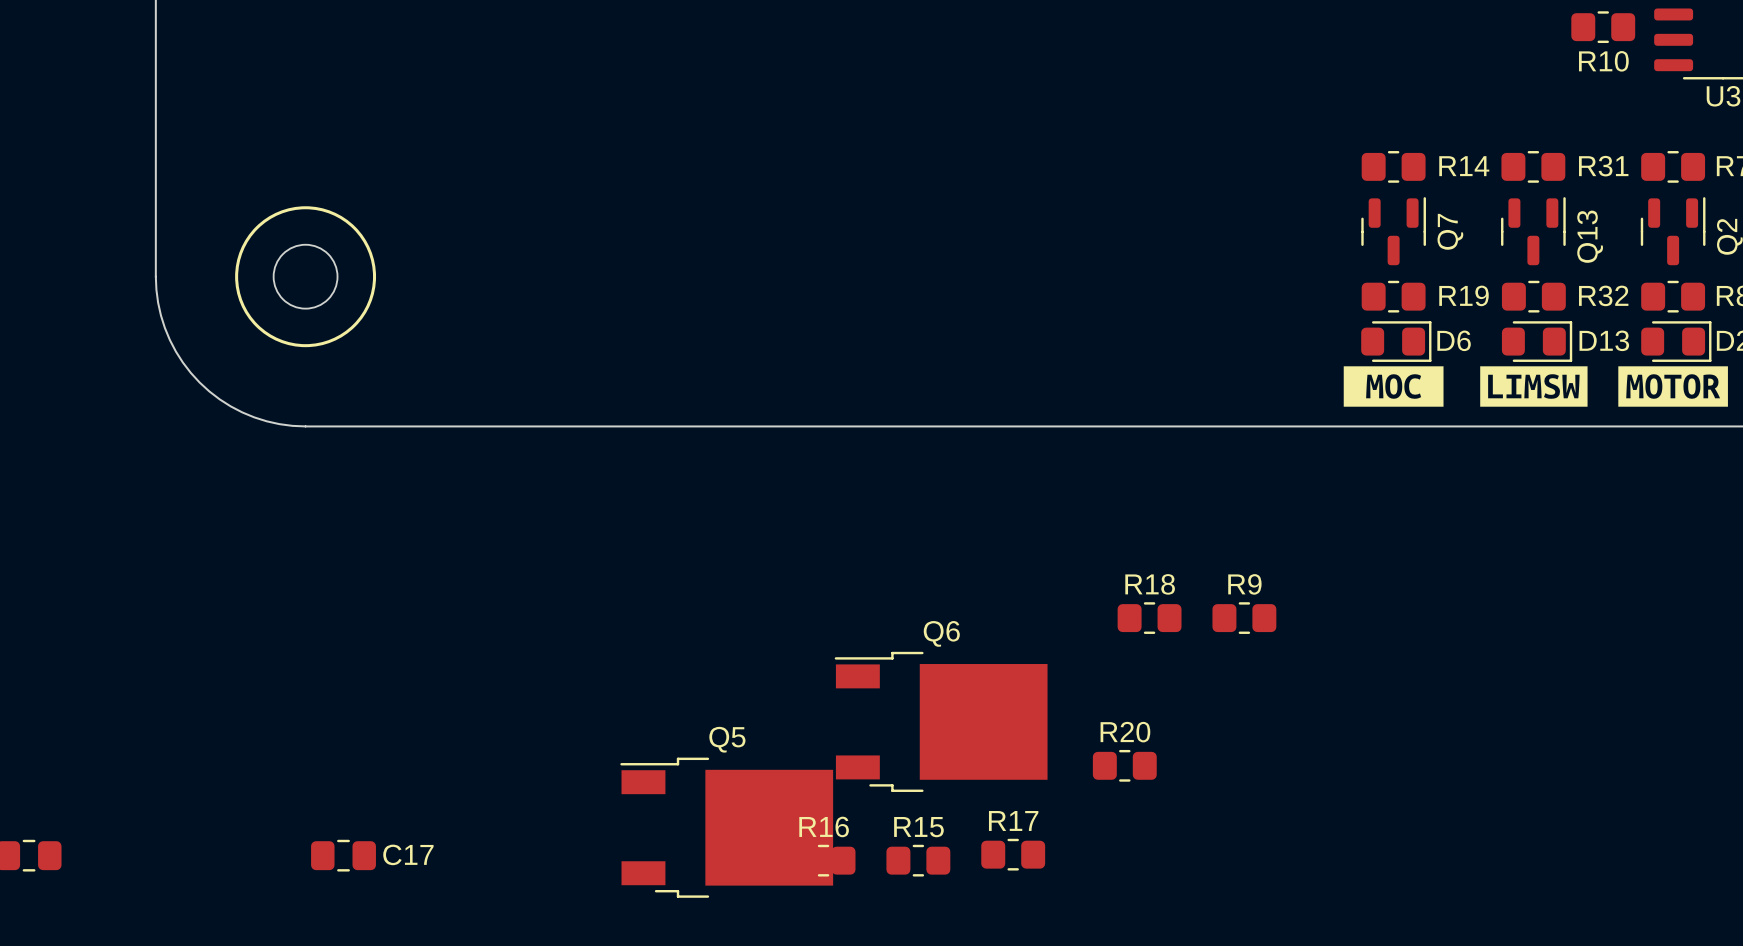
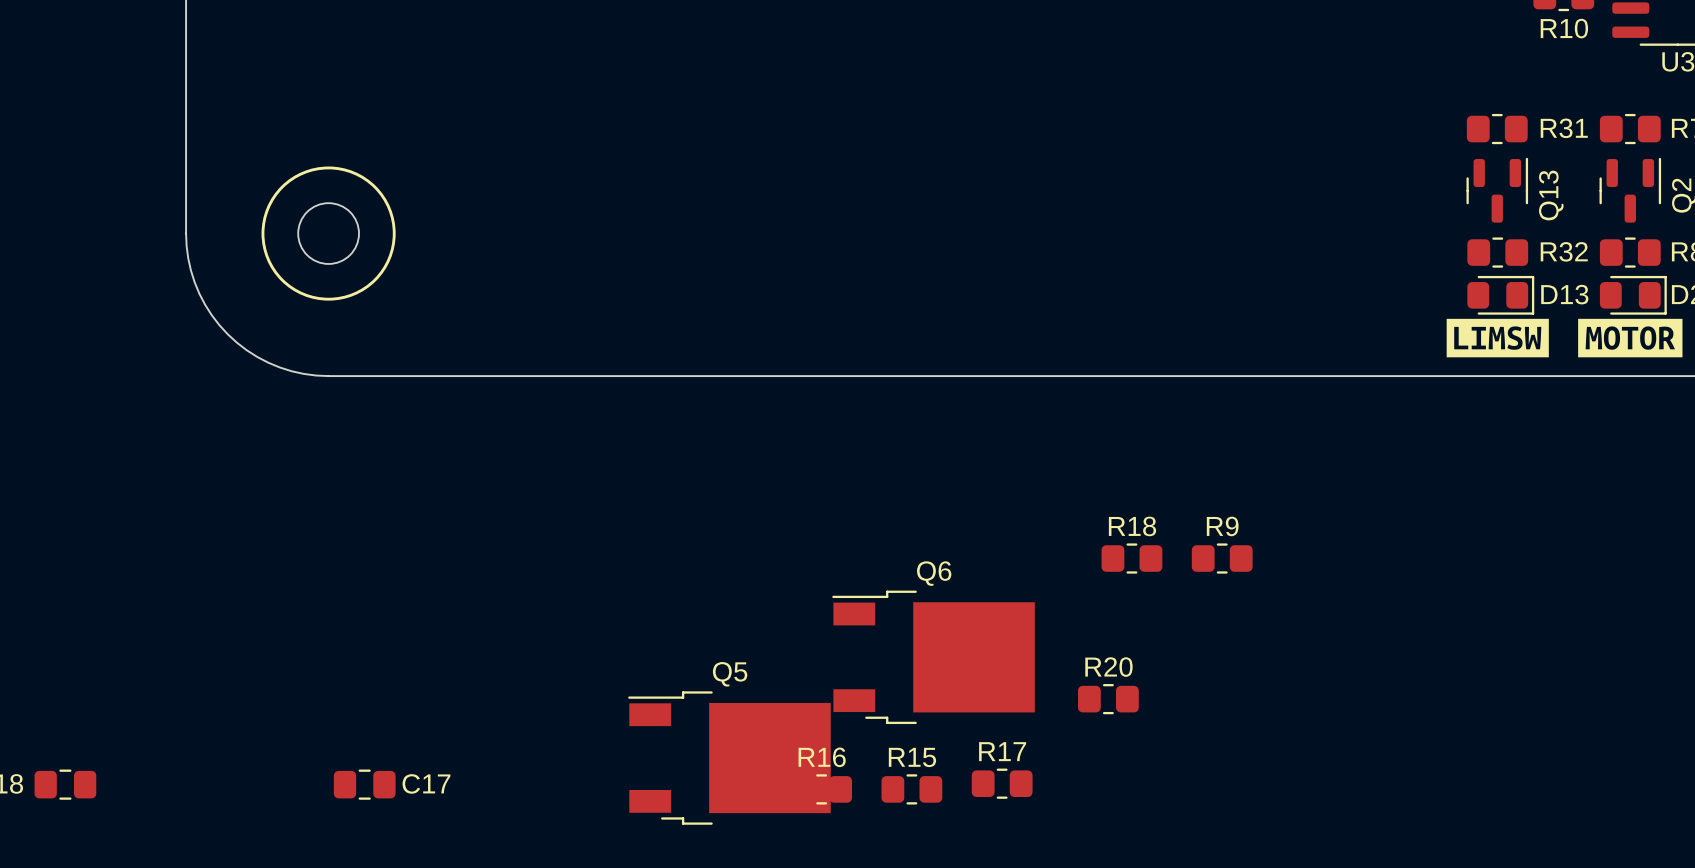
R14: (1393, 166) -> none
Q7: (1393, 231) -> none
R19: (1393, 296) -> none
D6: (1396, 341) -> none
drawing: [1343, 366, 1444, 407] -> none

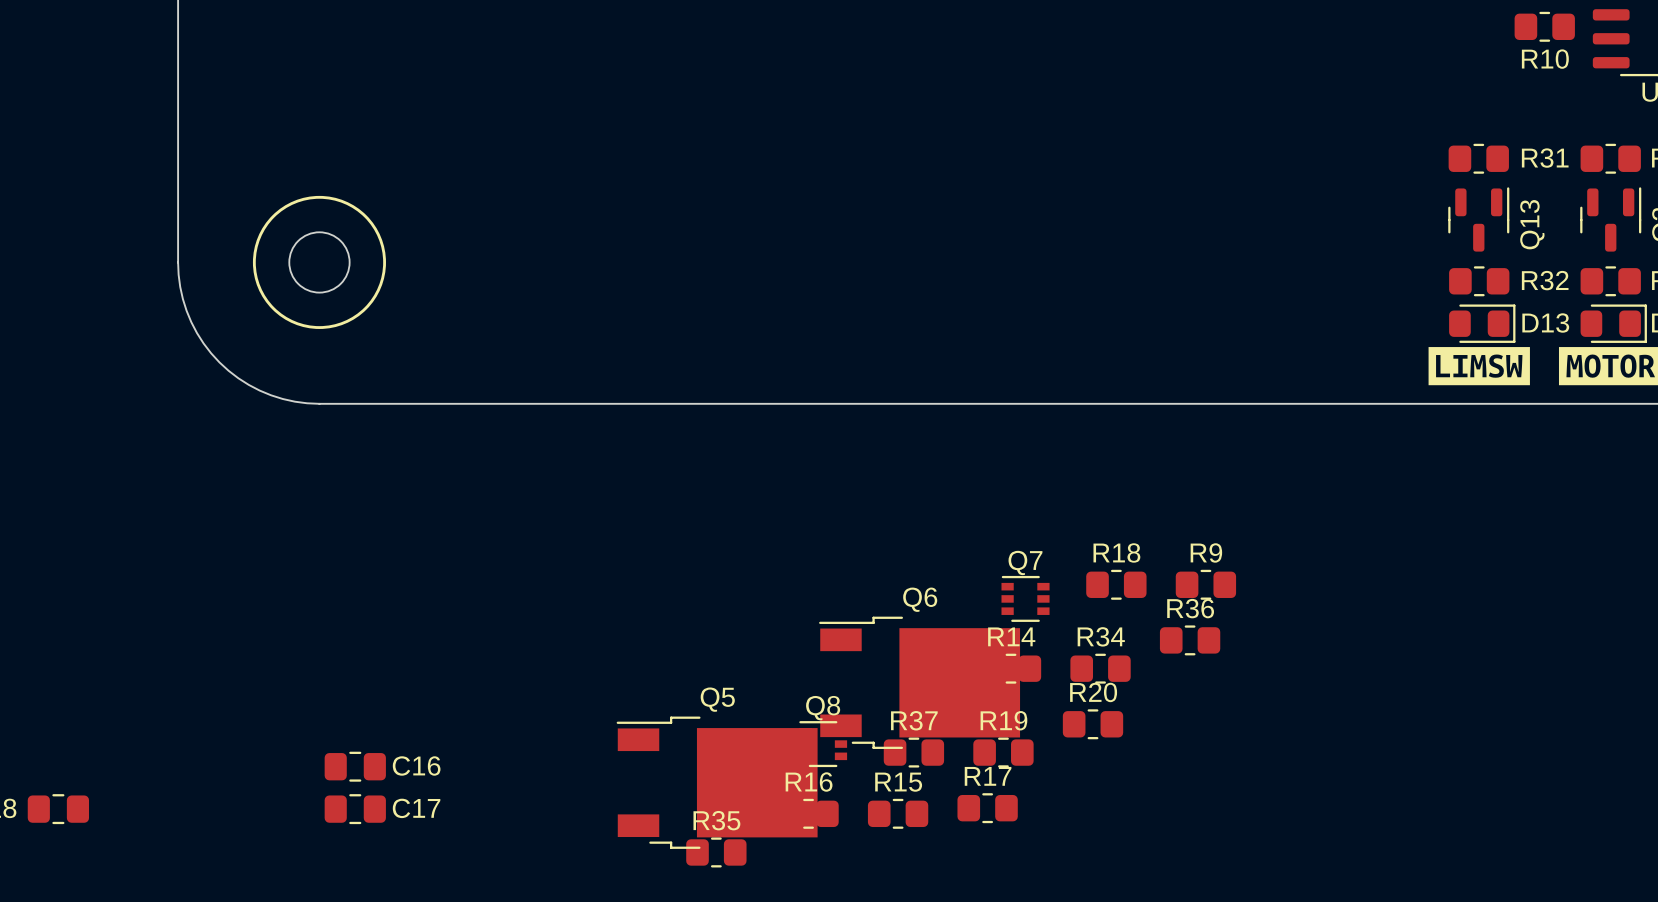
Q7: none -> (1025, 598)
R36: none -> (1190, 640)
R14: none -> (1011, 668)
R34: none -> (1100, 668)
Q8: none -> (823, 744)
R37: none -> (913, 752)
R19: none -> (1003, 752)
C16: none -> (355, 766)
R35: none -> (716, 852)

